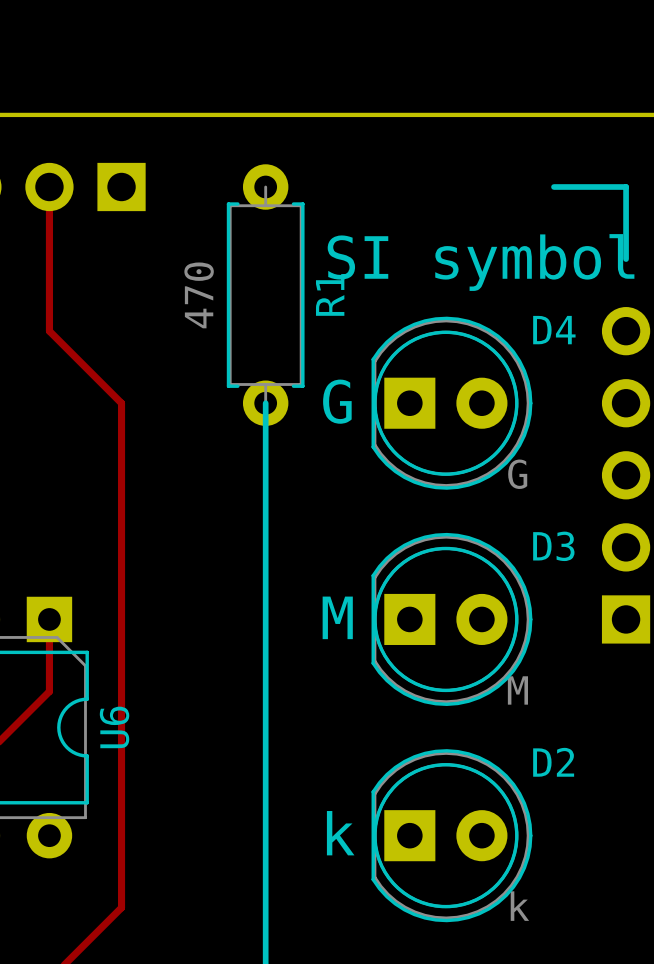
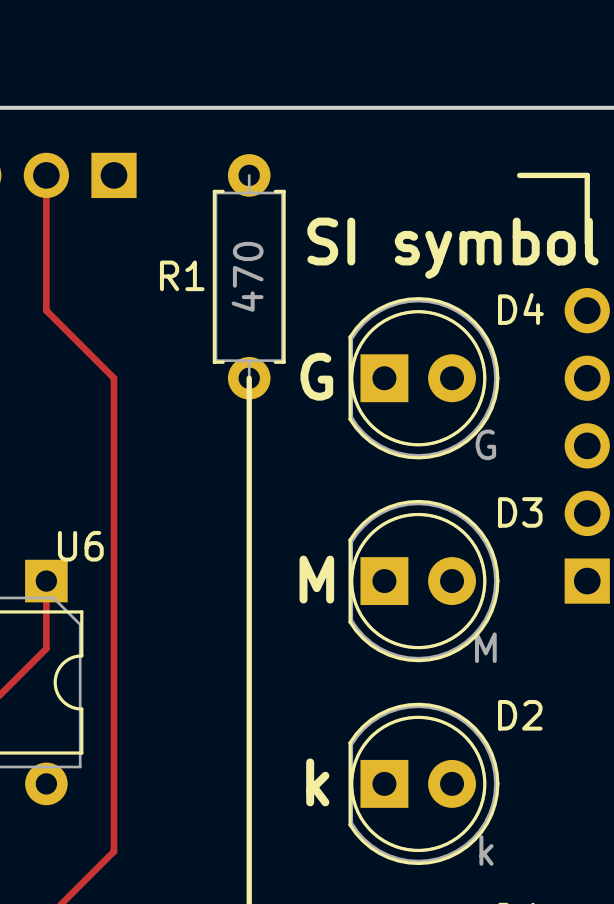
R1 value position: 470 (199, 295) -> 470 (247, 276)
R1 name rotation: 0° (330, 295) -> 90° clockwise (182, 275)
R1 name position: R1 (330, 295) -> R1 (182, 275)
U6 name rotation: 0° (114, 727) -> 90° clockwise (80, 546)
U6 name position: U6 (114, 727) -> U6 (80, 546)

